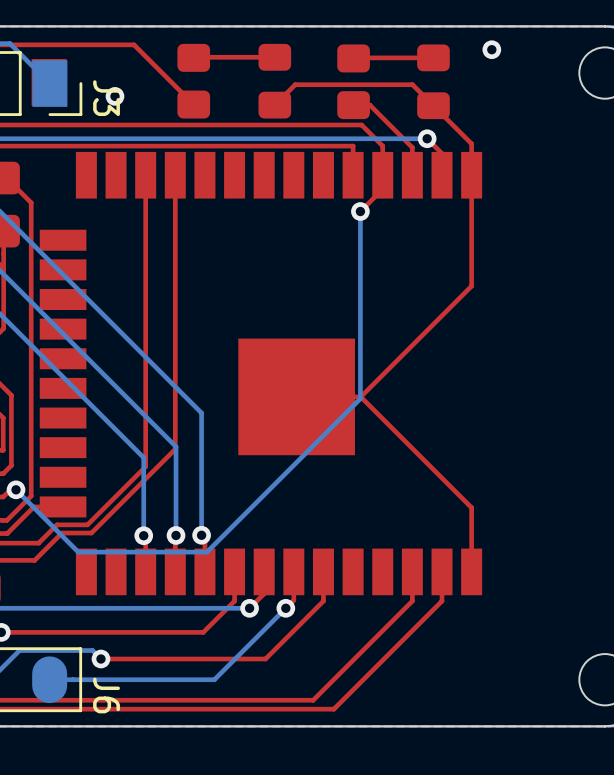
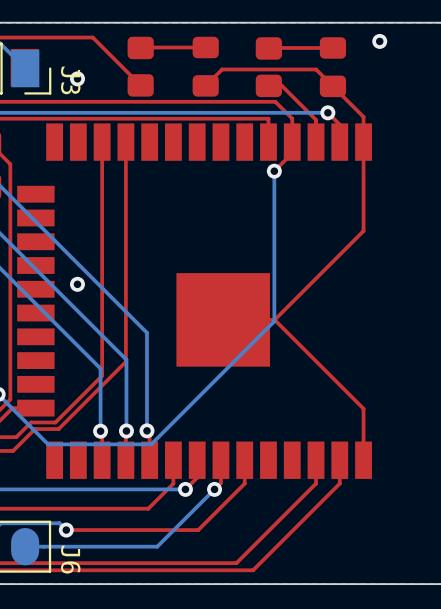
via: none -> (77, 284)

